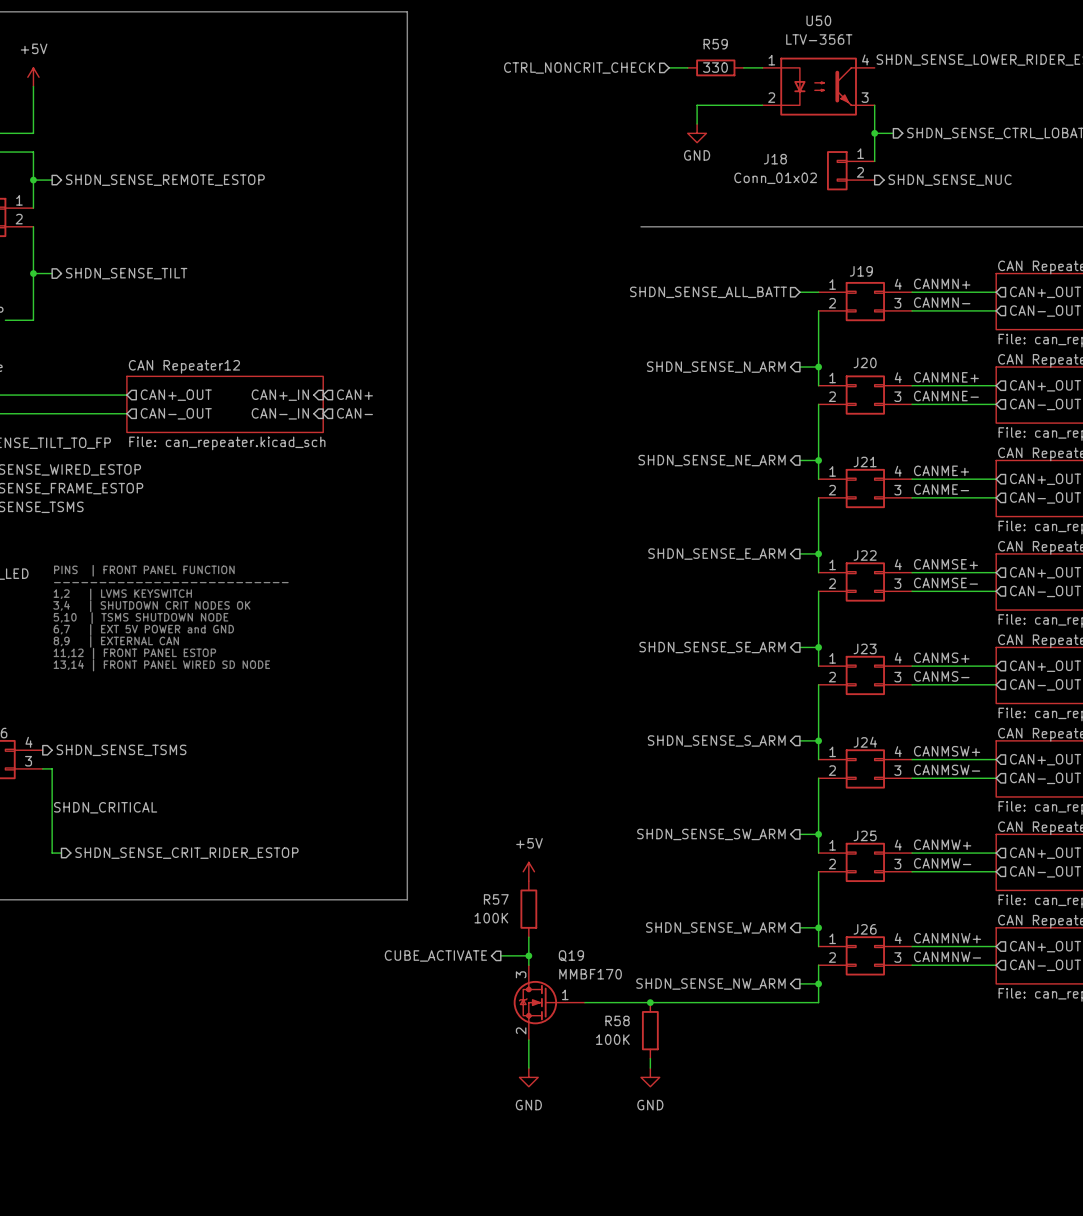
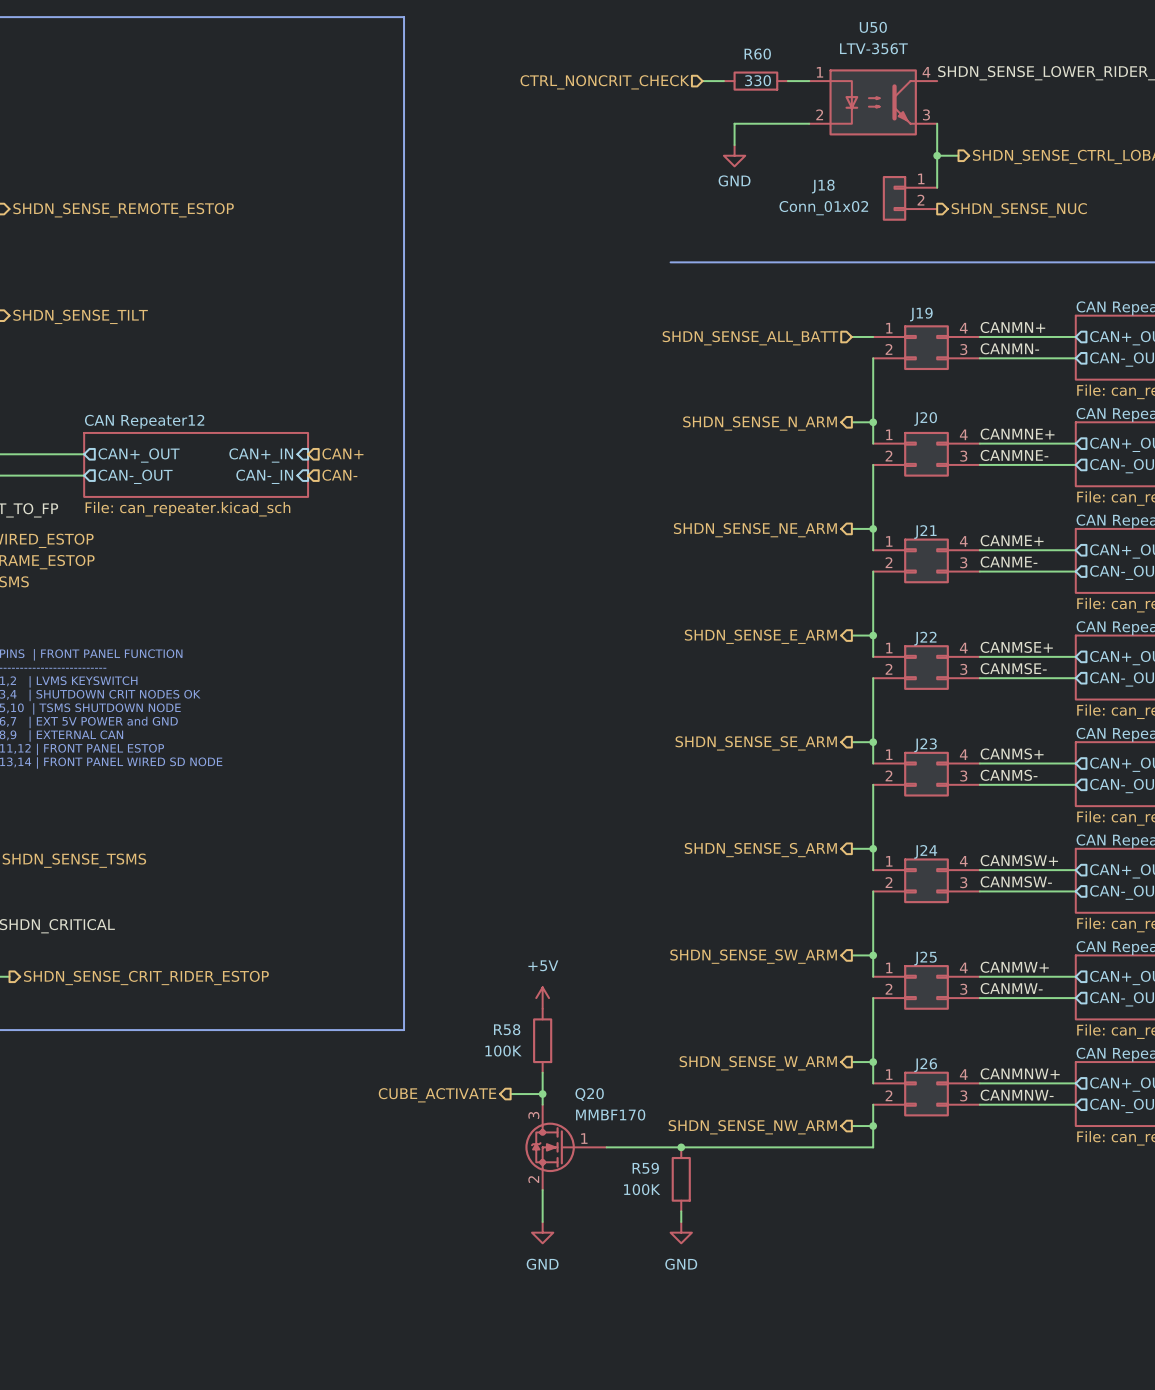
R59 name: R59 (715, 44) -> R60 (757, 54)
R57 name: R57 (496, 899) -> R58 (507, 1029)
Q19 name: Q19 (571, 955) -> Q20 (589, 1094)
R58 name: R58 (617, 1020) -> R59 (645, 1168)

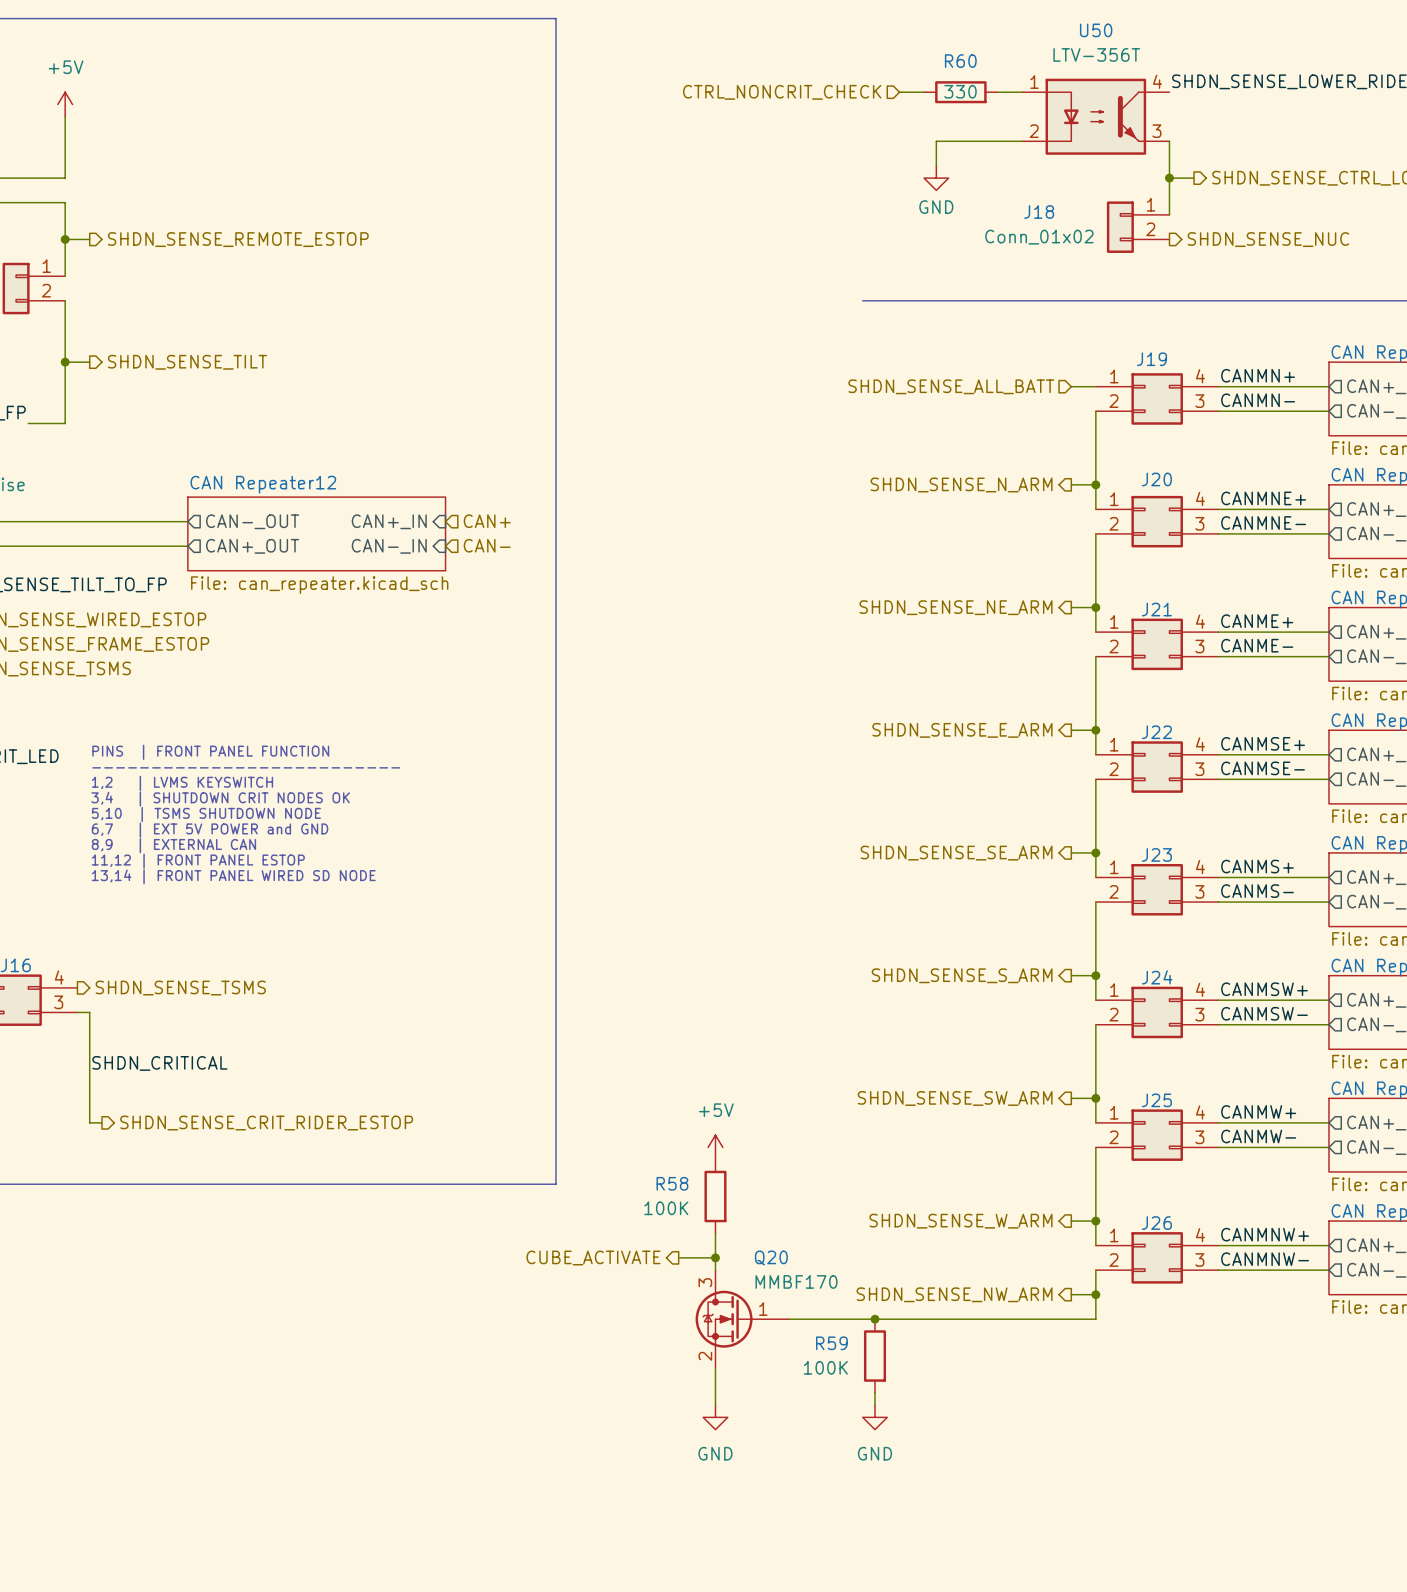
sheet pin: CAN+_OUT (139, 455) -> CAN-_OUT (252, 521)
sheet pin: CAN-_OUT (135, 476) -> CAN+_OUT (252, 546)

